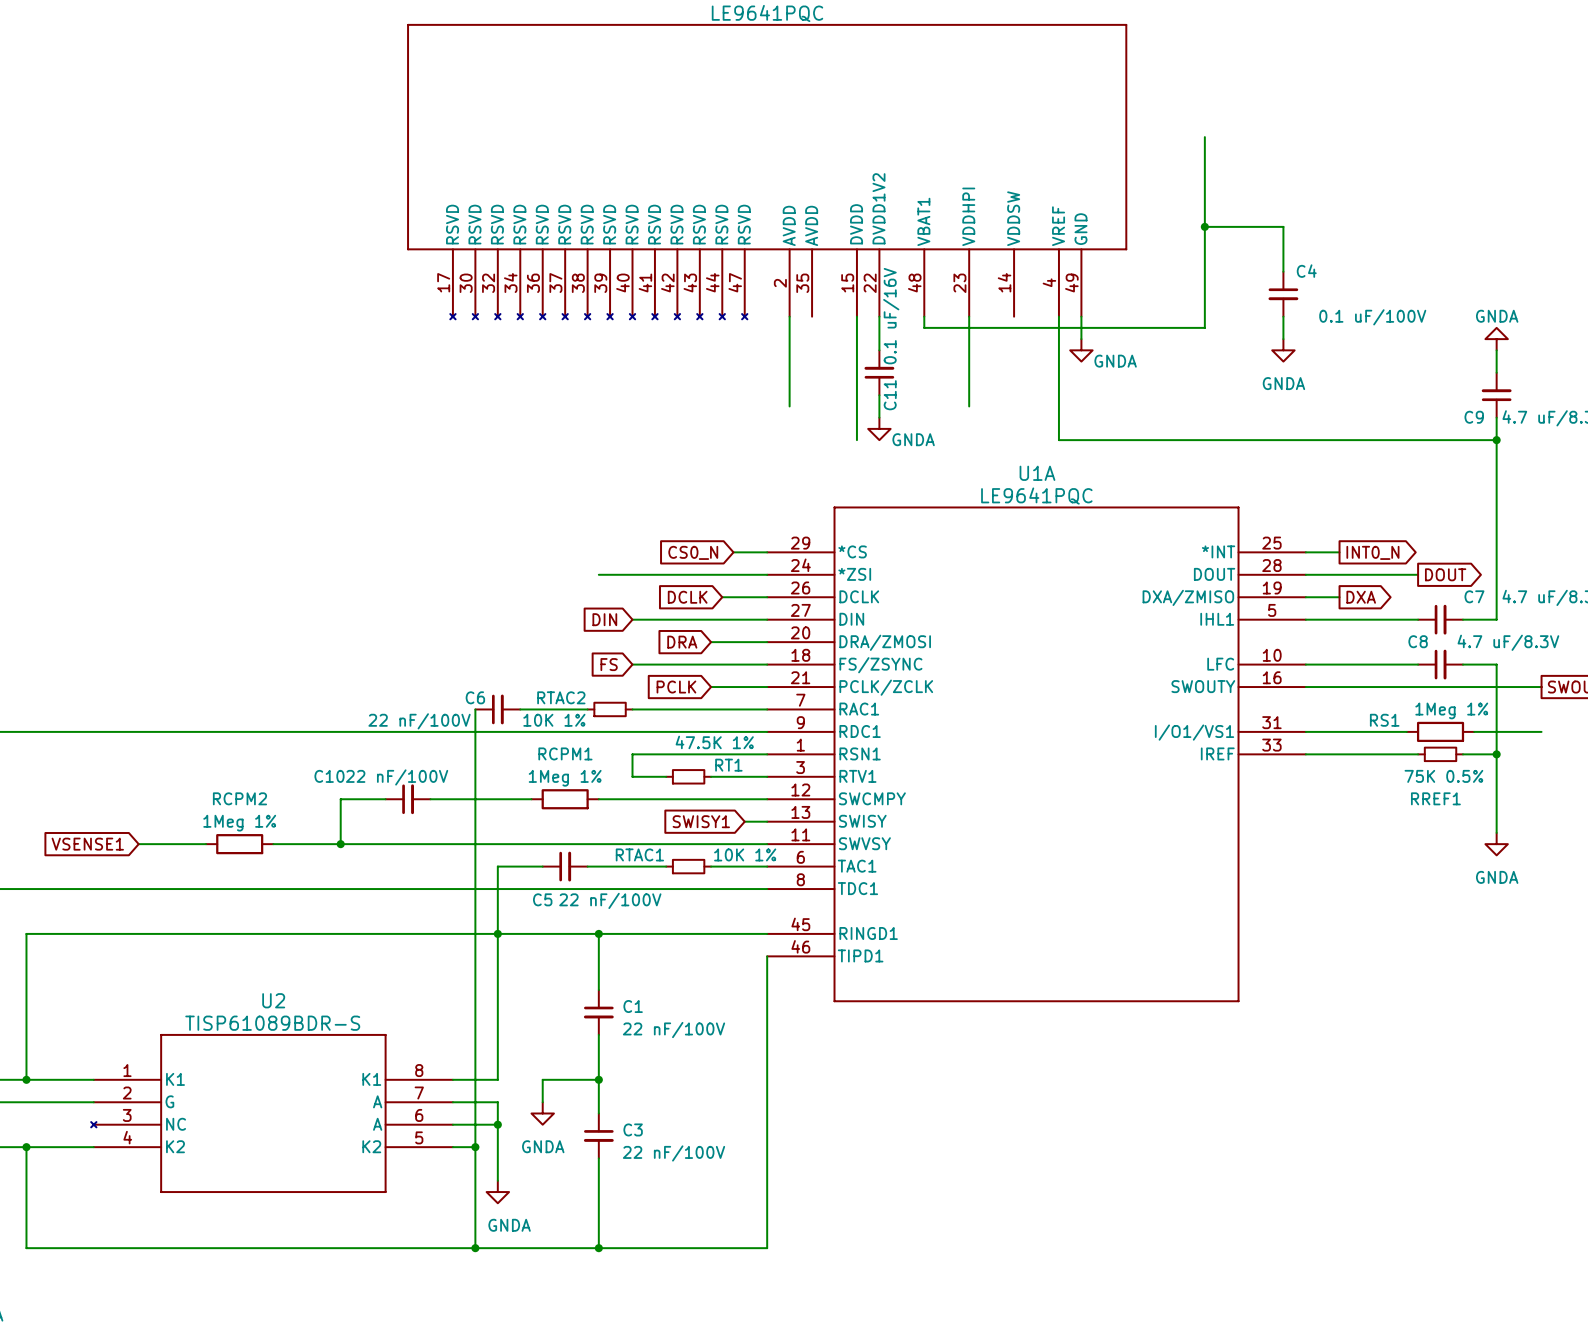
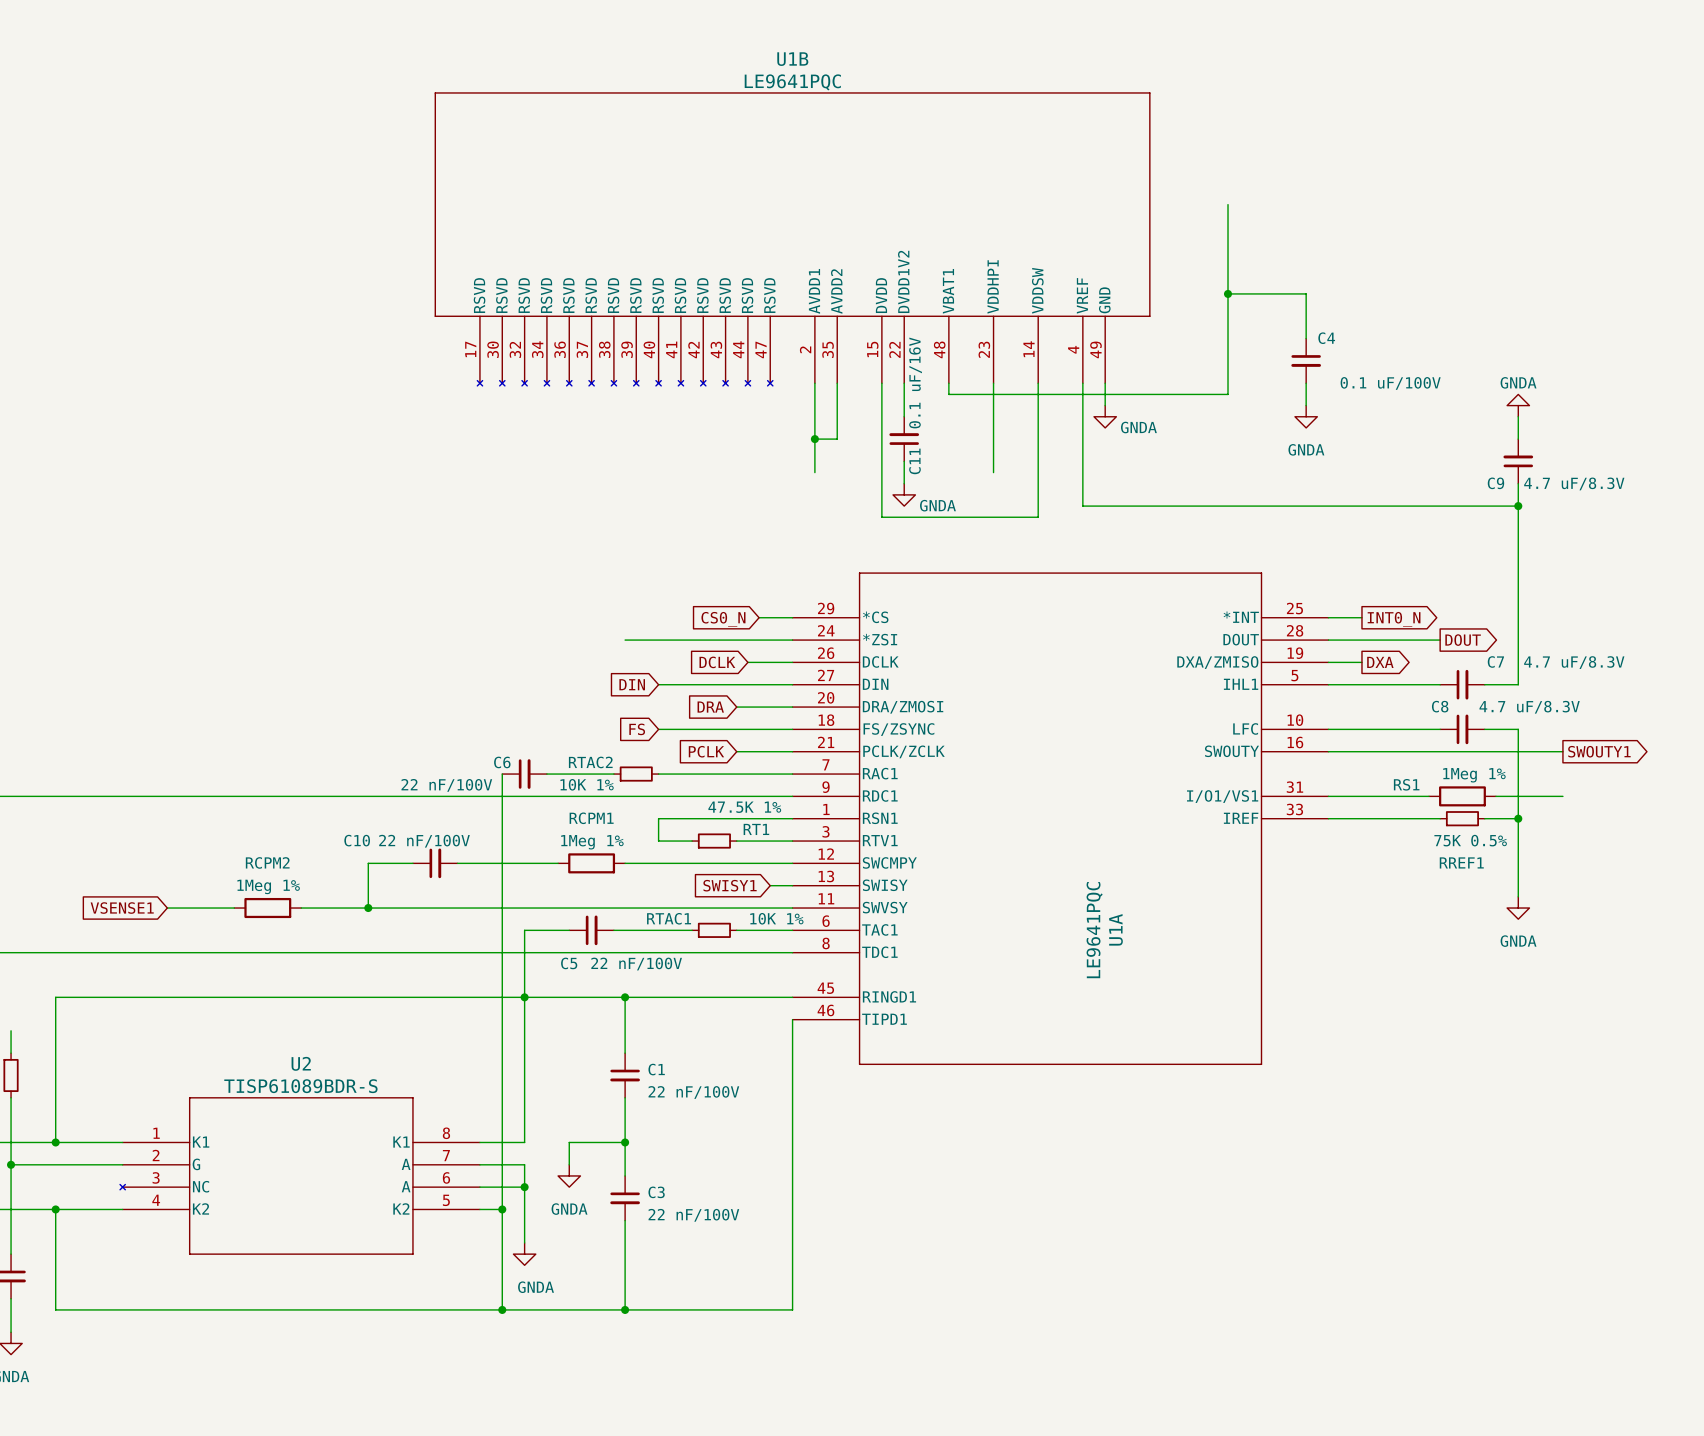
U1B pin name: AVDD (789, 225) -> AVDD1 (814, 291)
U1B pin name: AVDD (811, 225) -> AVDD2 (836, 291)
wire: none -> (837, 383) (837, 439) (814, 439)
wire: none -> (1038, 383) (1038, 517) (881, 517) (881, 506)
junction: none -> (814, 439)
U1A name rotation: 0° (1037, 473) -> 90° counterclockwise (1115, 929)
U1A name position: U1A (1037, 473) -> U1A (1115, 929)
U1A value rotation: 0° (1036, 496) -> 90° counterclockwise (1094, 930)
U1A value position: LE9641PQC (1036, 496) -> LE9641PQC (1094, 930)

